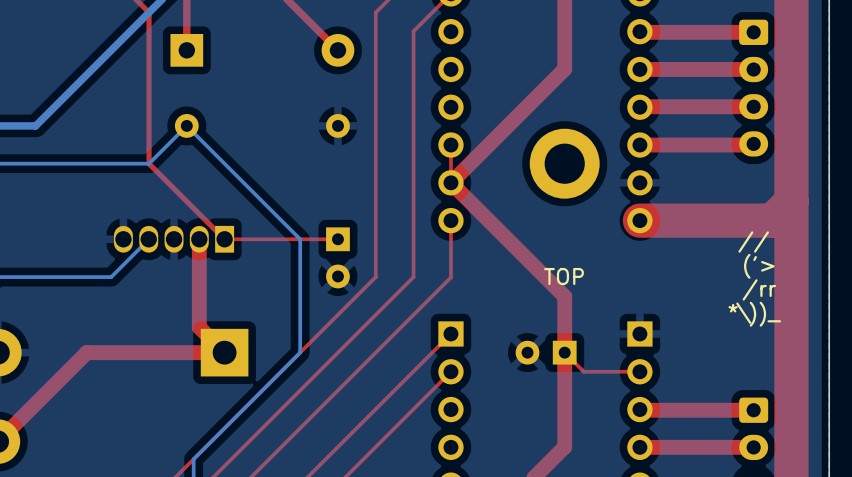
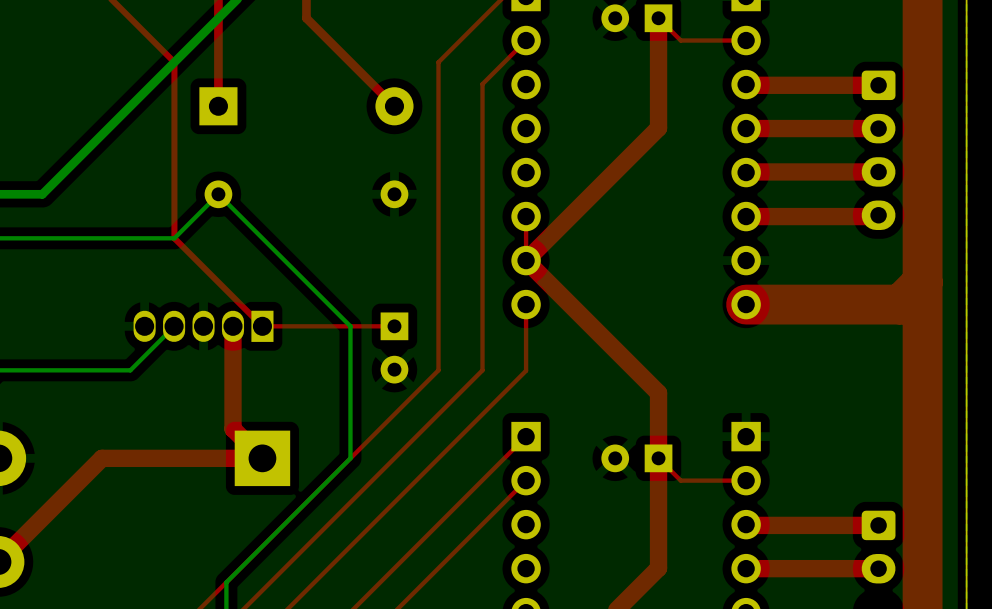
part: (564, 163) -> none
text: // (753, 242) -> none
text: ('> (759, 266) -> none
text: TOP (564, 276) -> none
text: /rr (759, 289) -> none
text: *\))_ (754, 314) -> none

